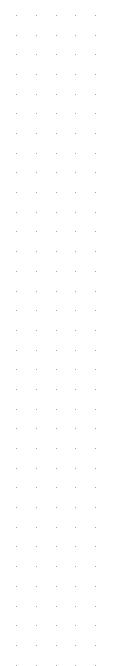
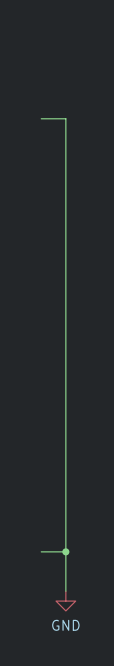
wire: none -> (41, 118) (65, 118) (65, 591)
wire: none -> (41, 551) (65, 551)
junction: none -> (65, 551)
power symbol: none -> GND (65, 601)

